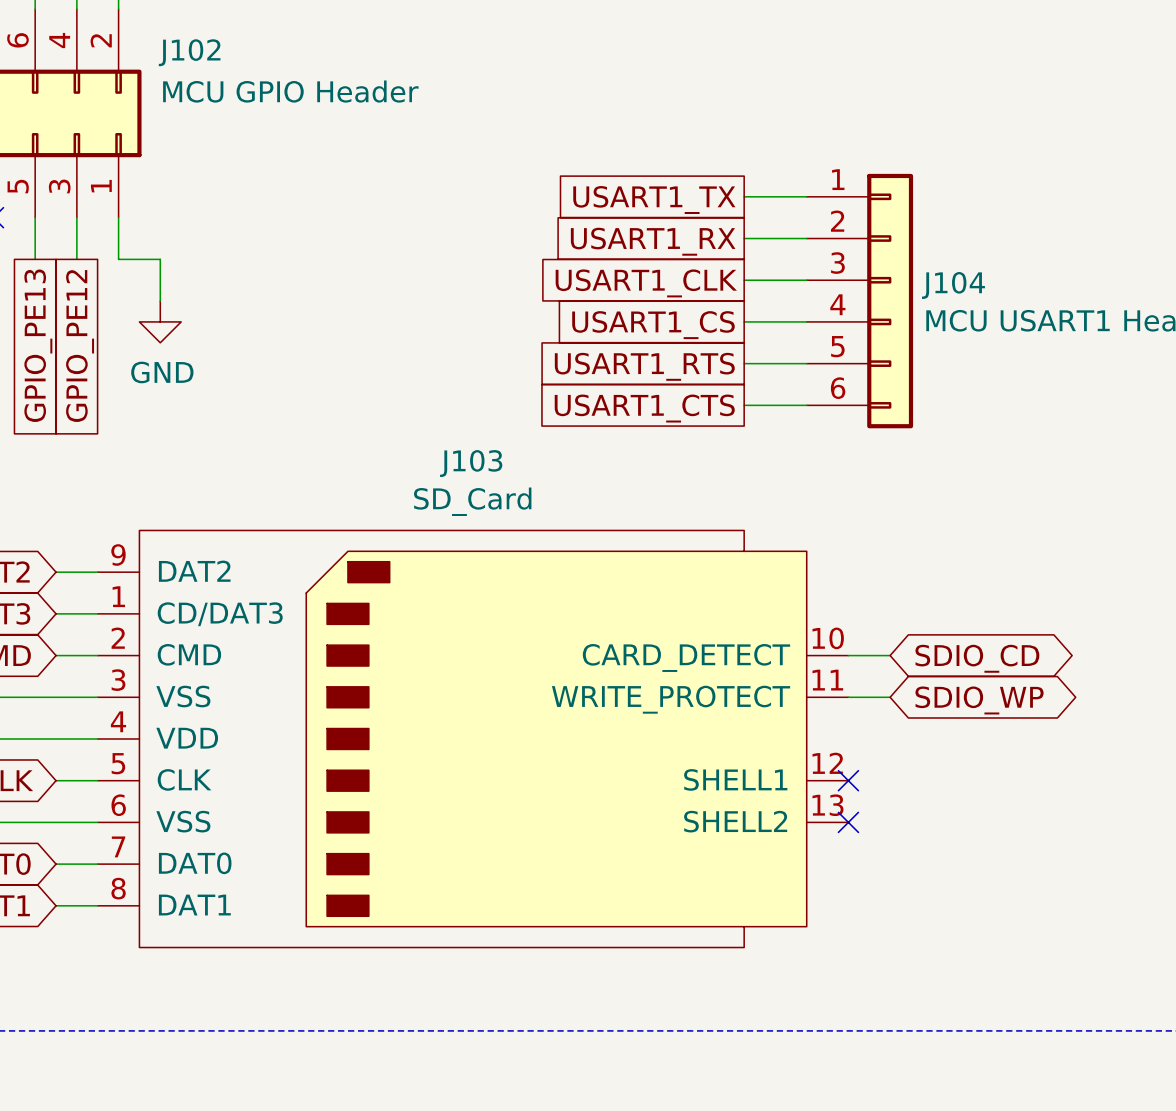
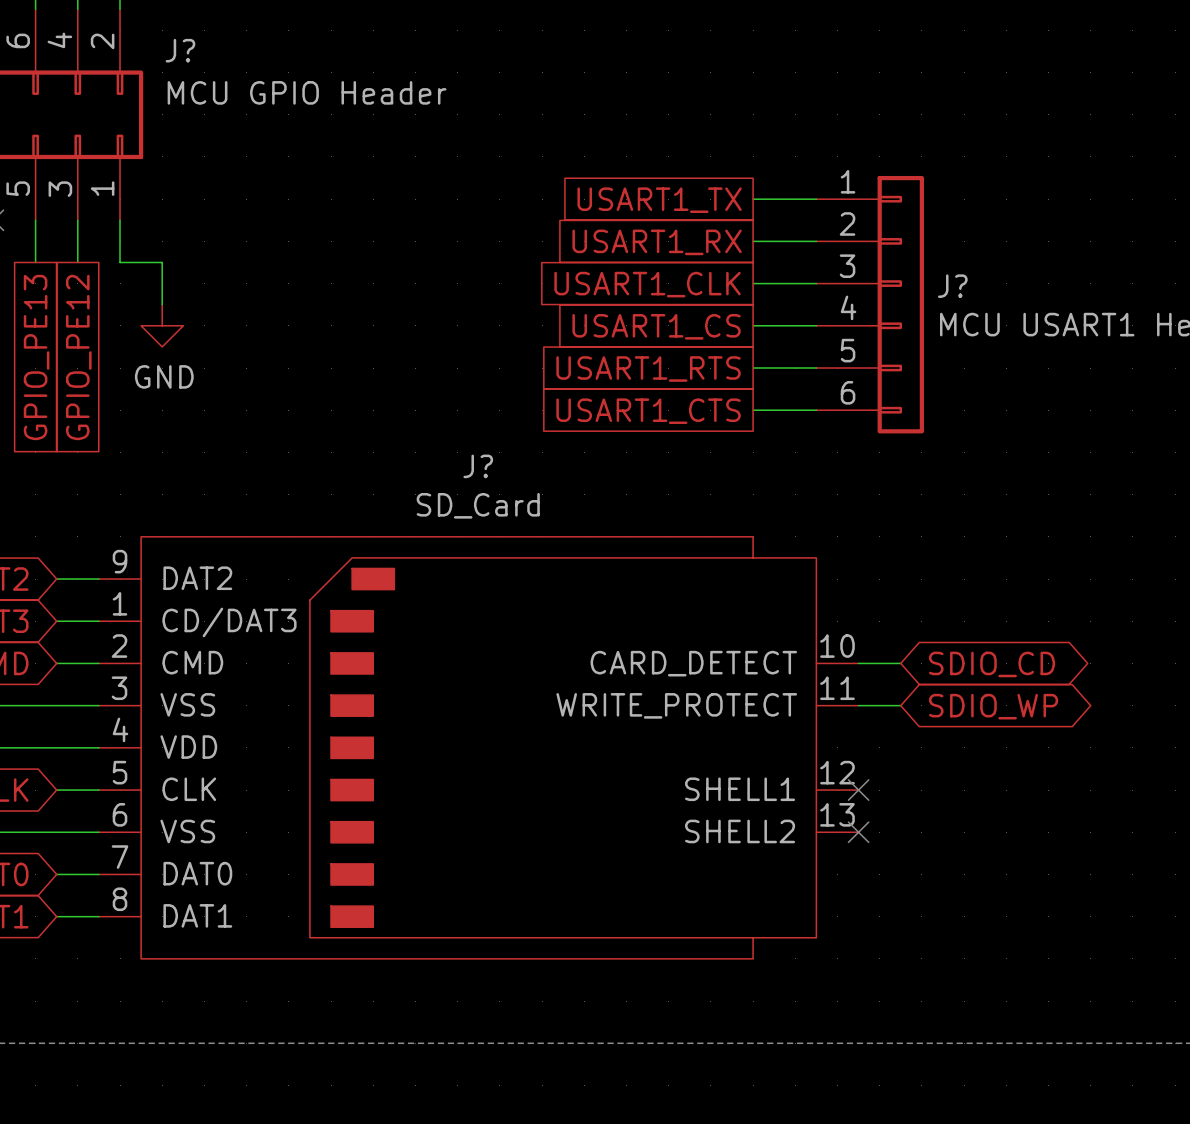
J102 name: J102 (189, 52) -> J? (180, 50)
J104 name: J104 (953, 285) -> J? (952, 286)
J103 name: J103 (471, 463) -> J? (478, 466)

